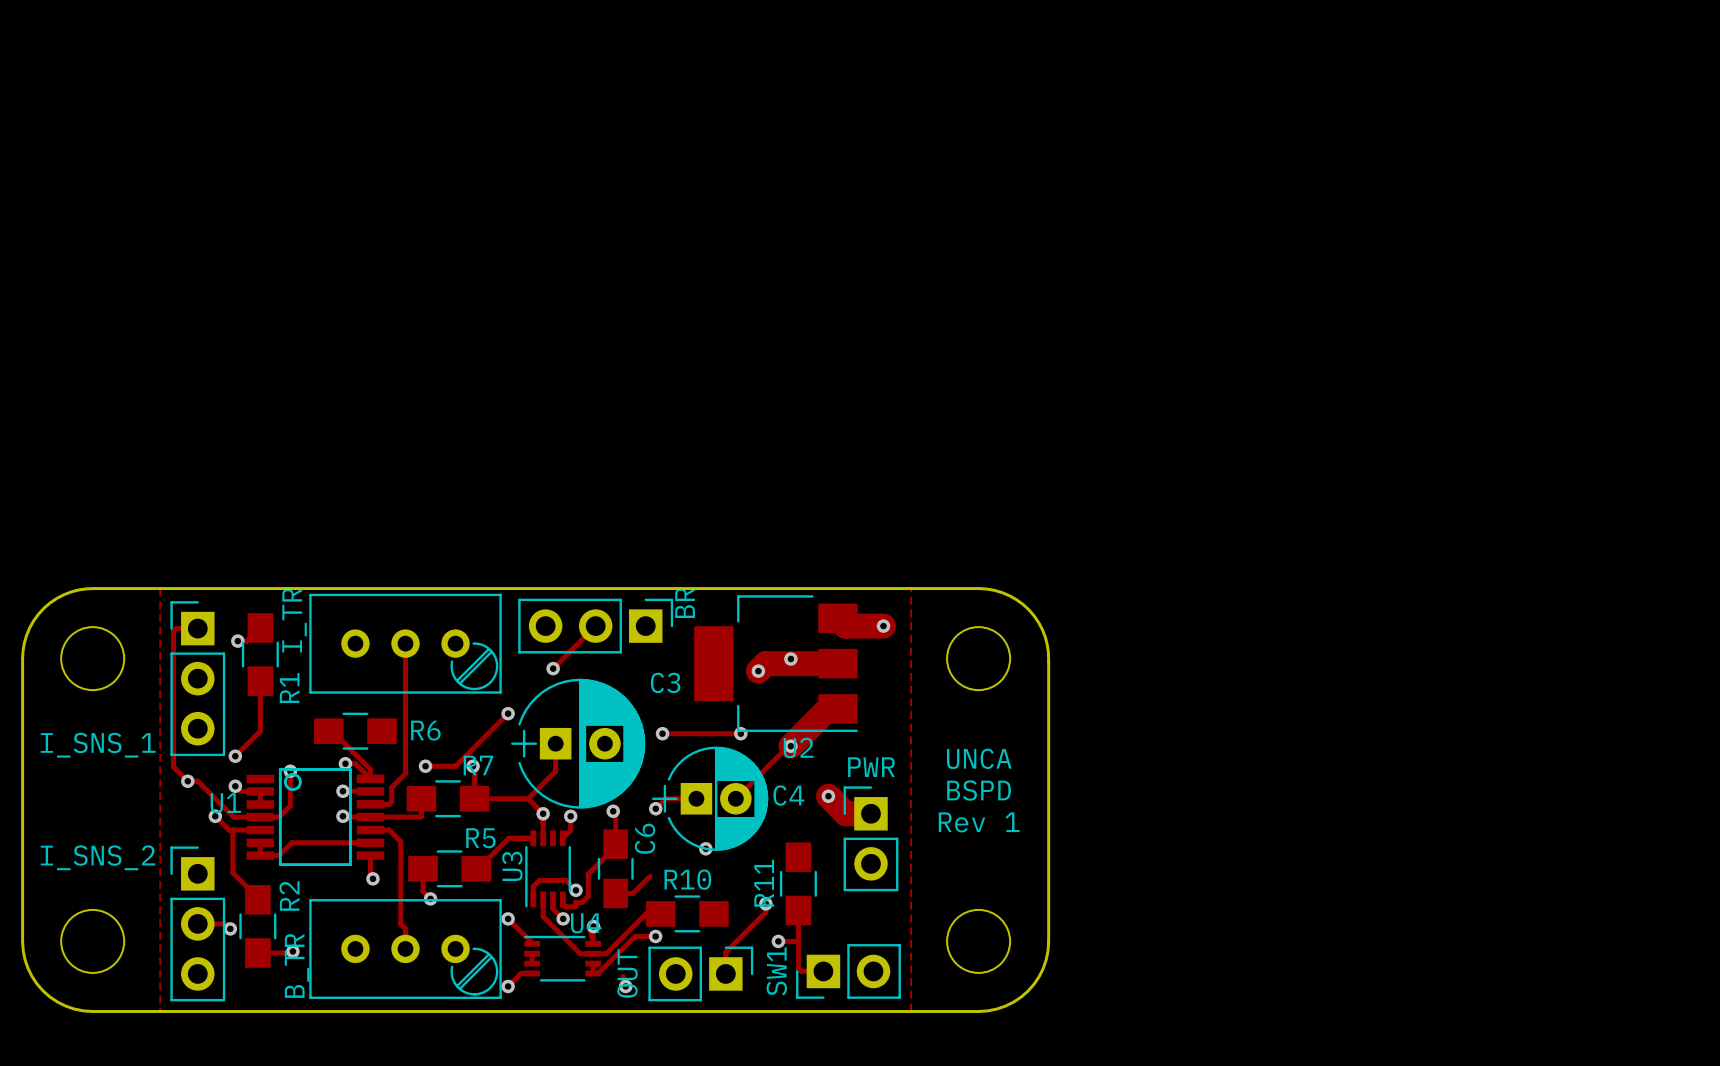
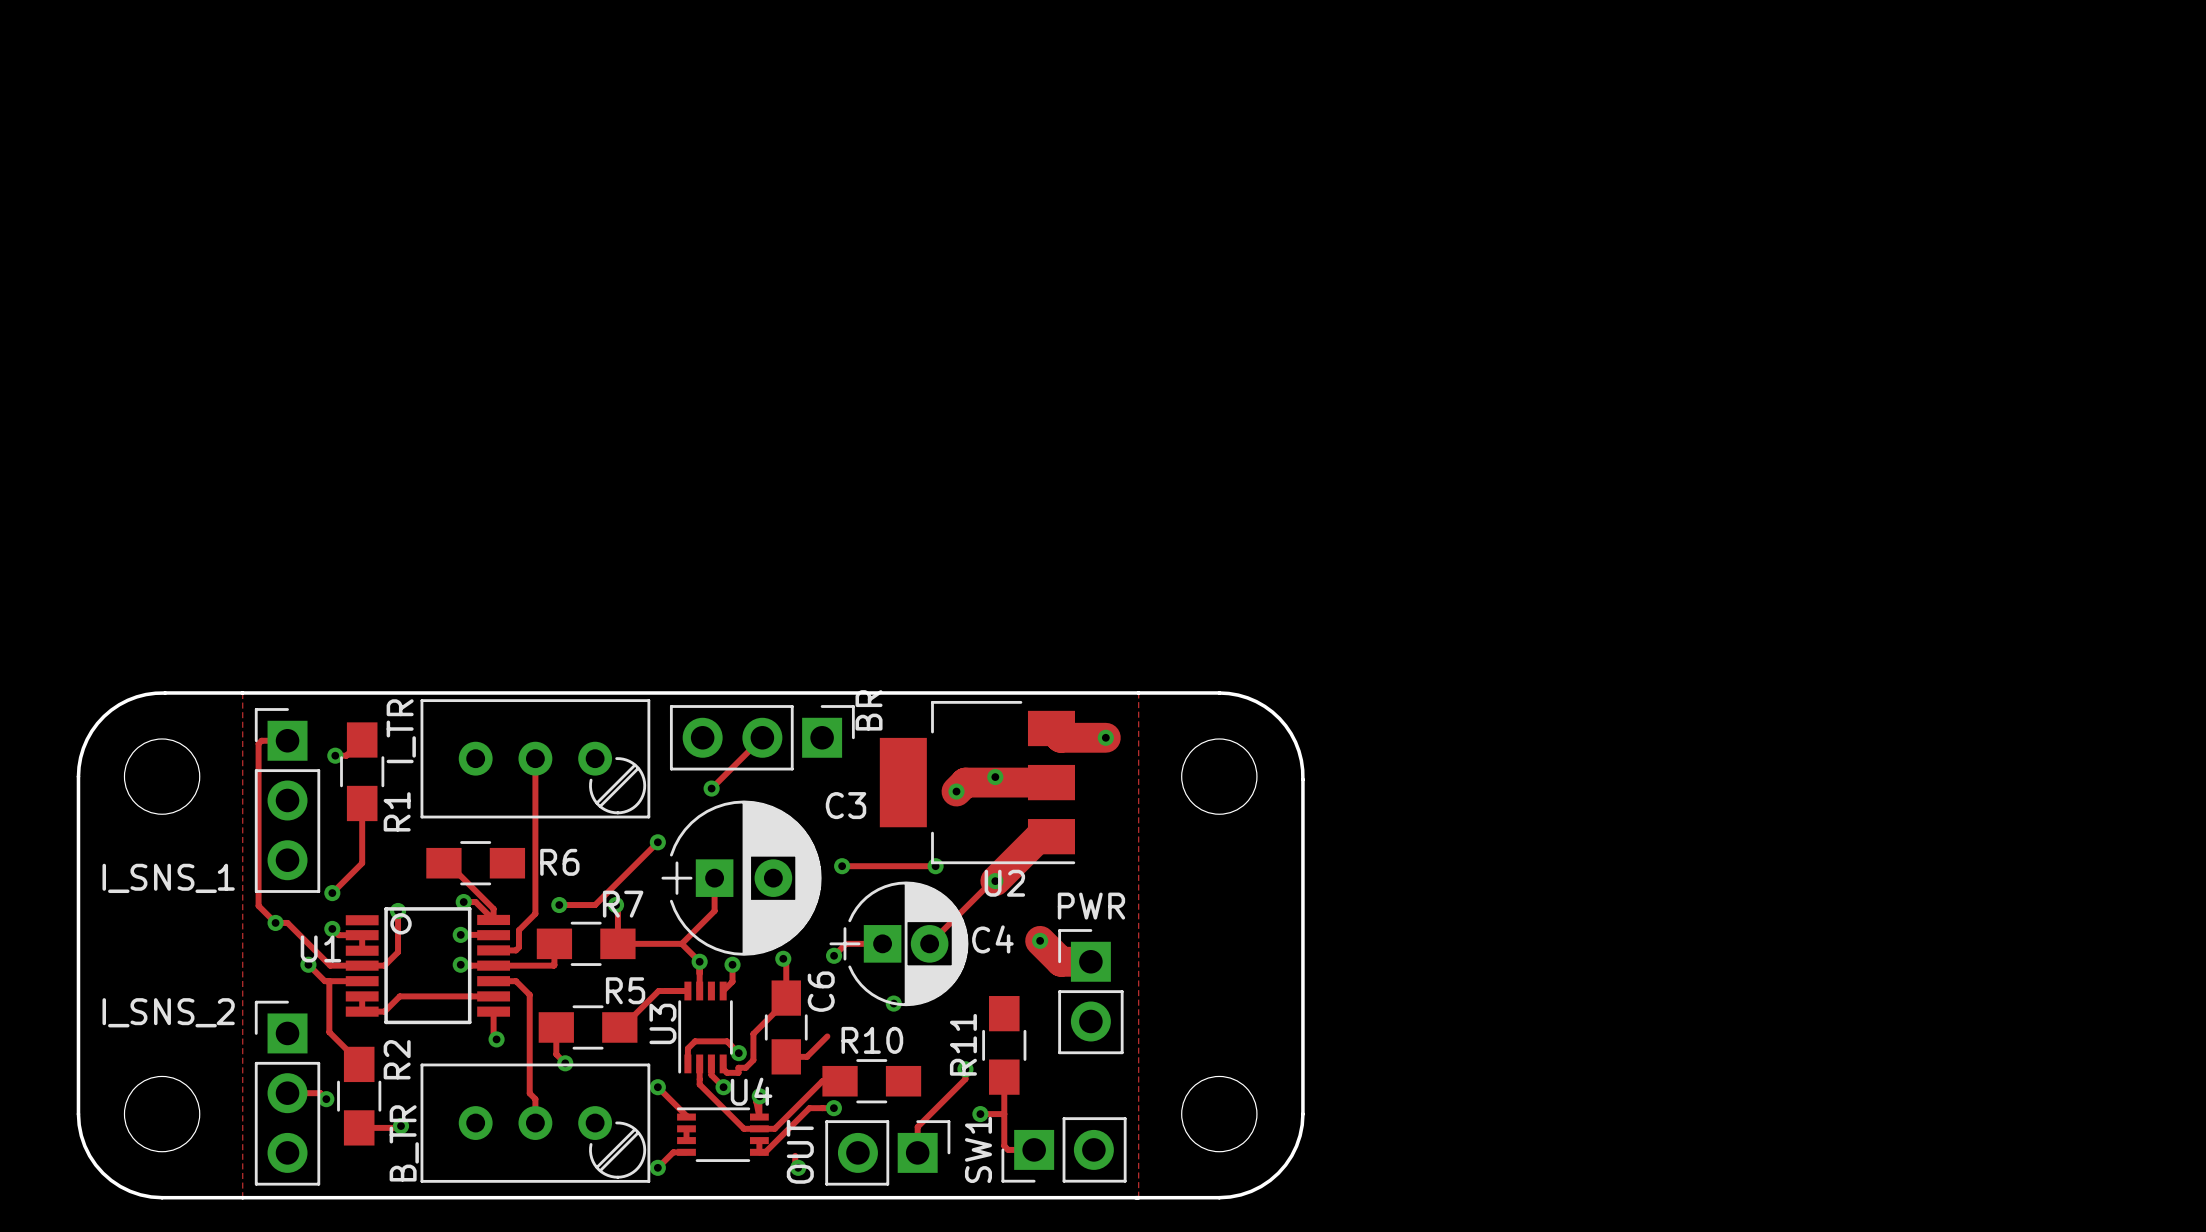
text: UNCA (979, 758) -> none
text: BSPD (979, 790) -> none
text: Rev 1 (979, 822) -> none

